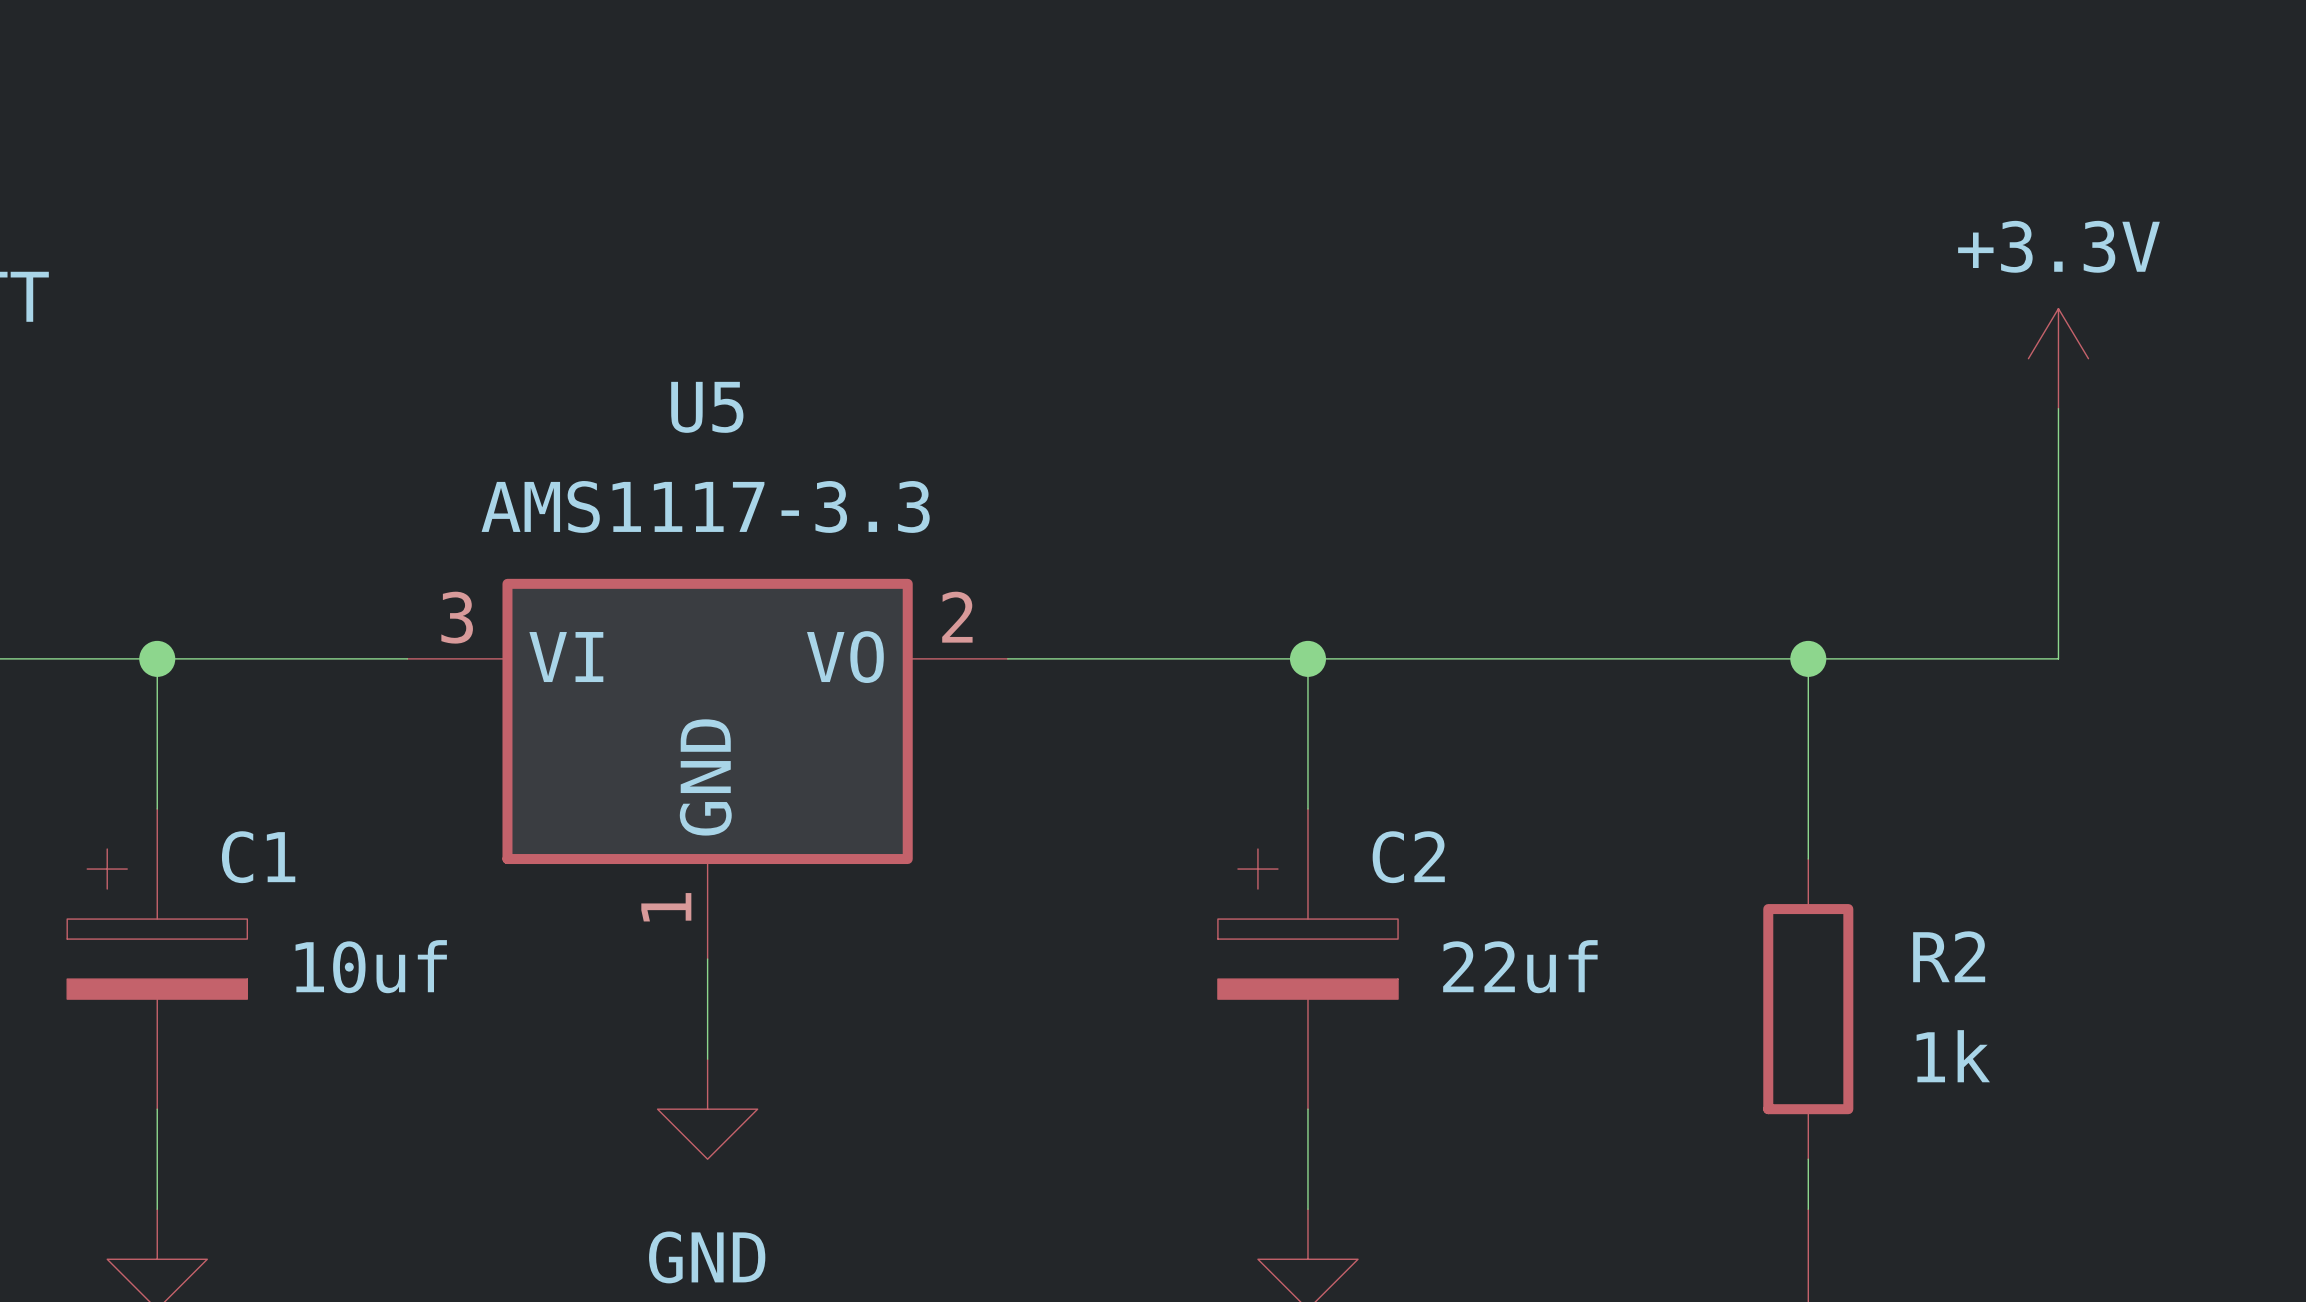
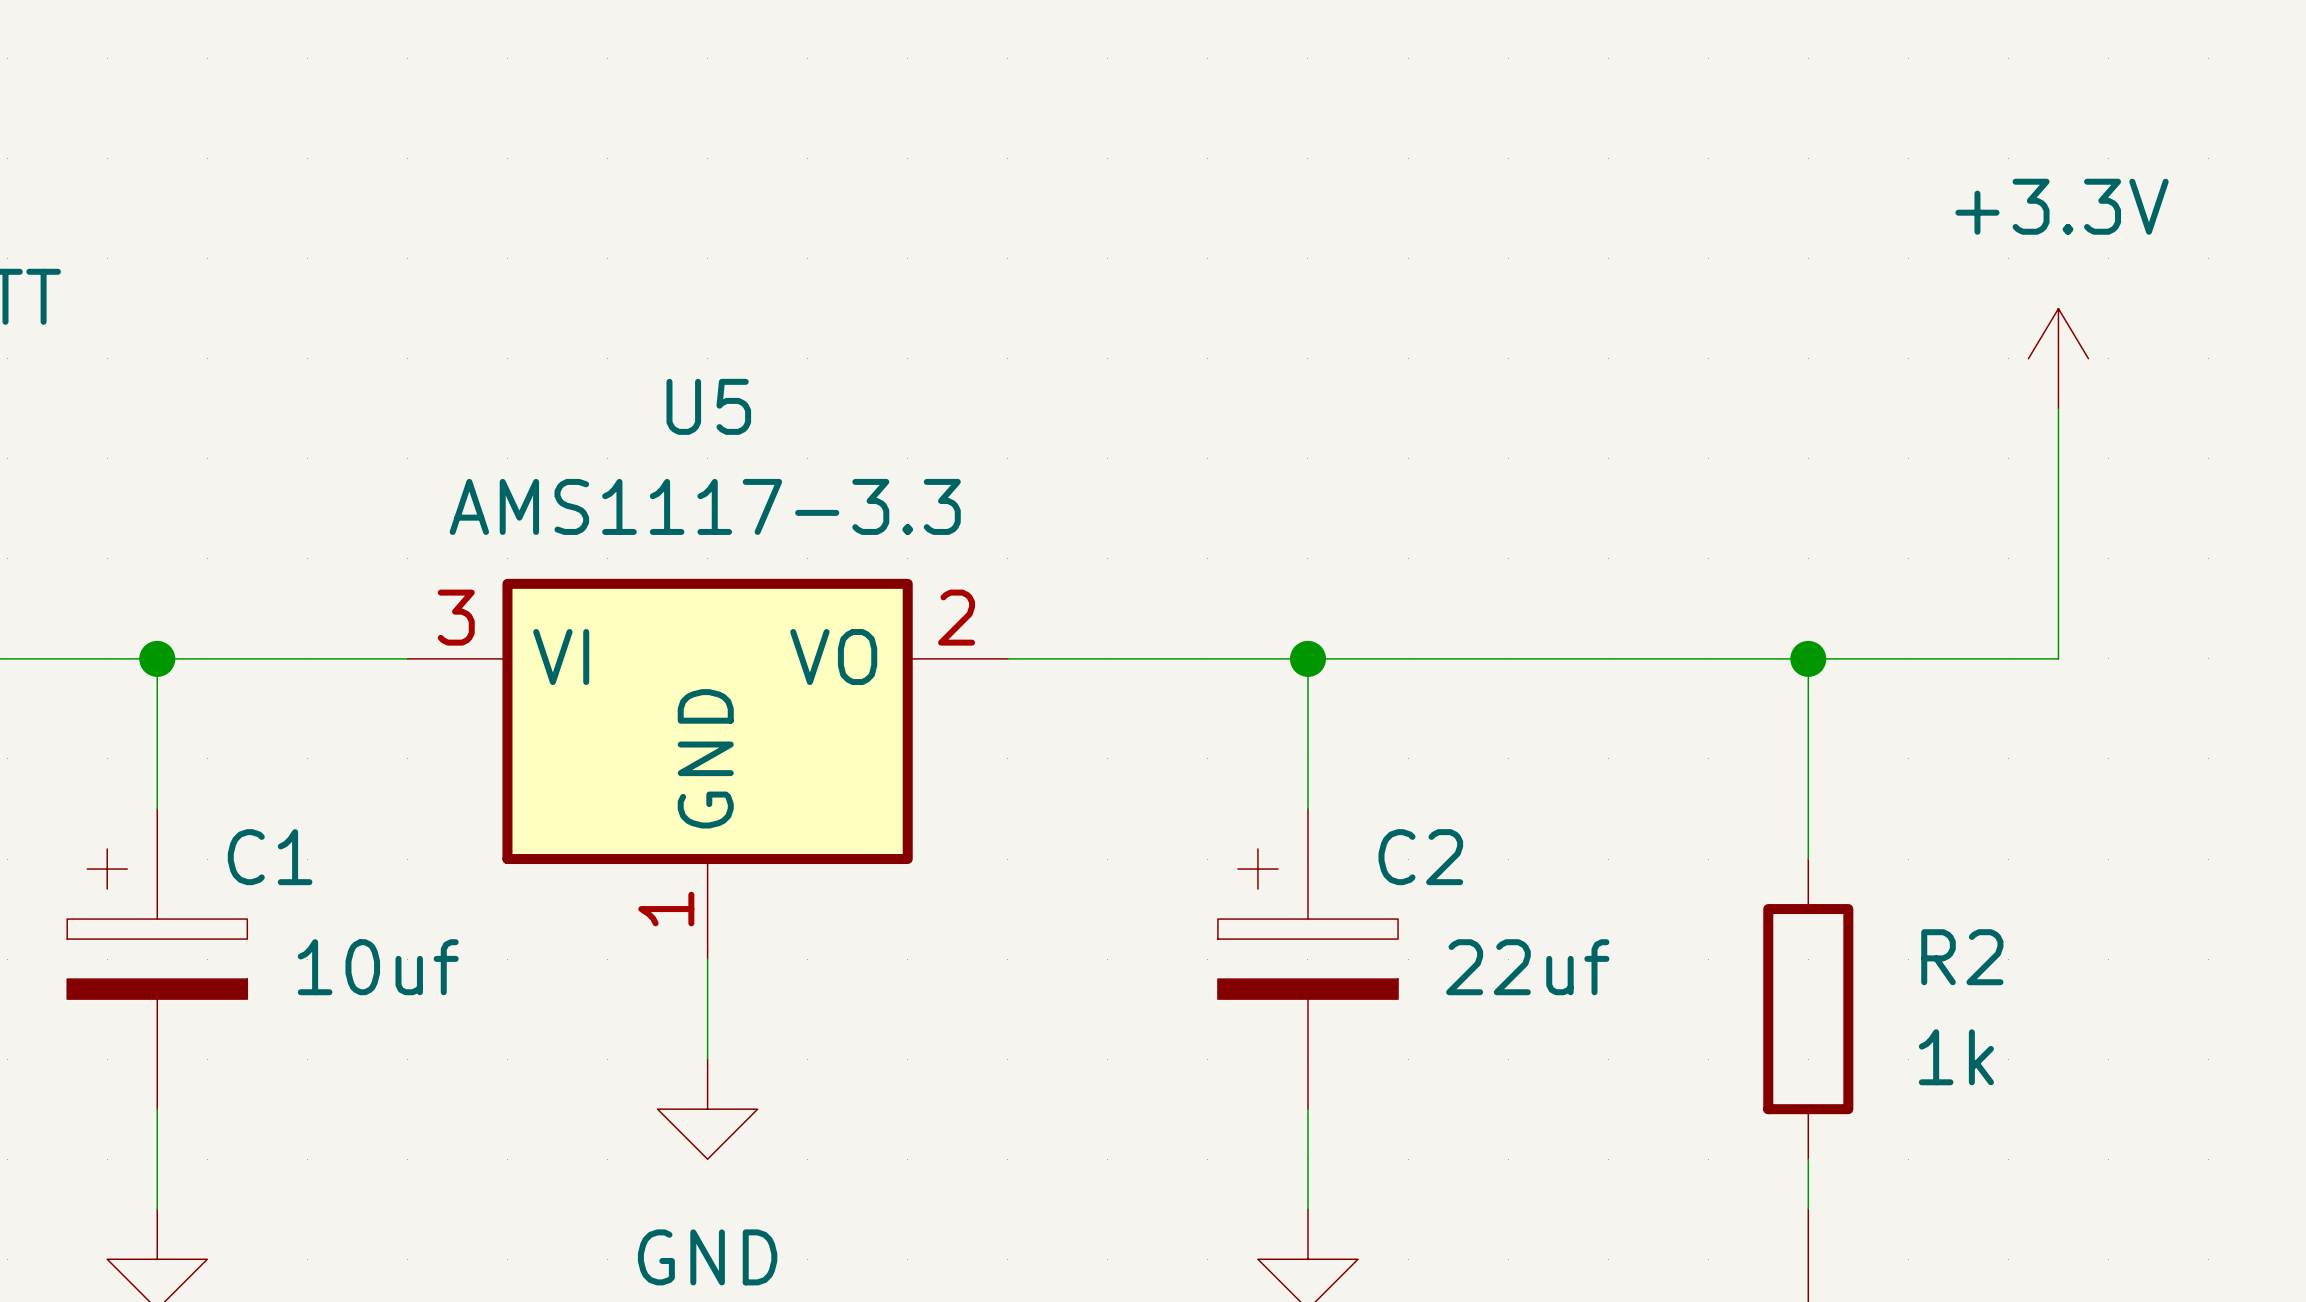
power symbol text position: +3.3V (2058, 246) -> +3.3V (2062, 206)

